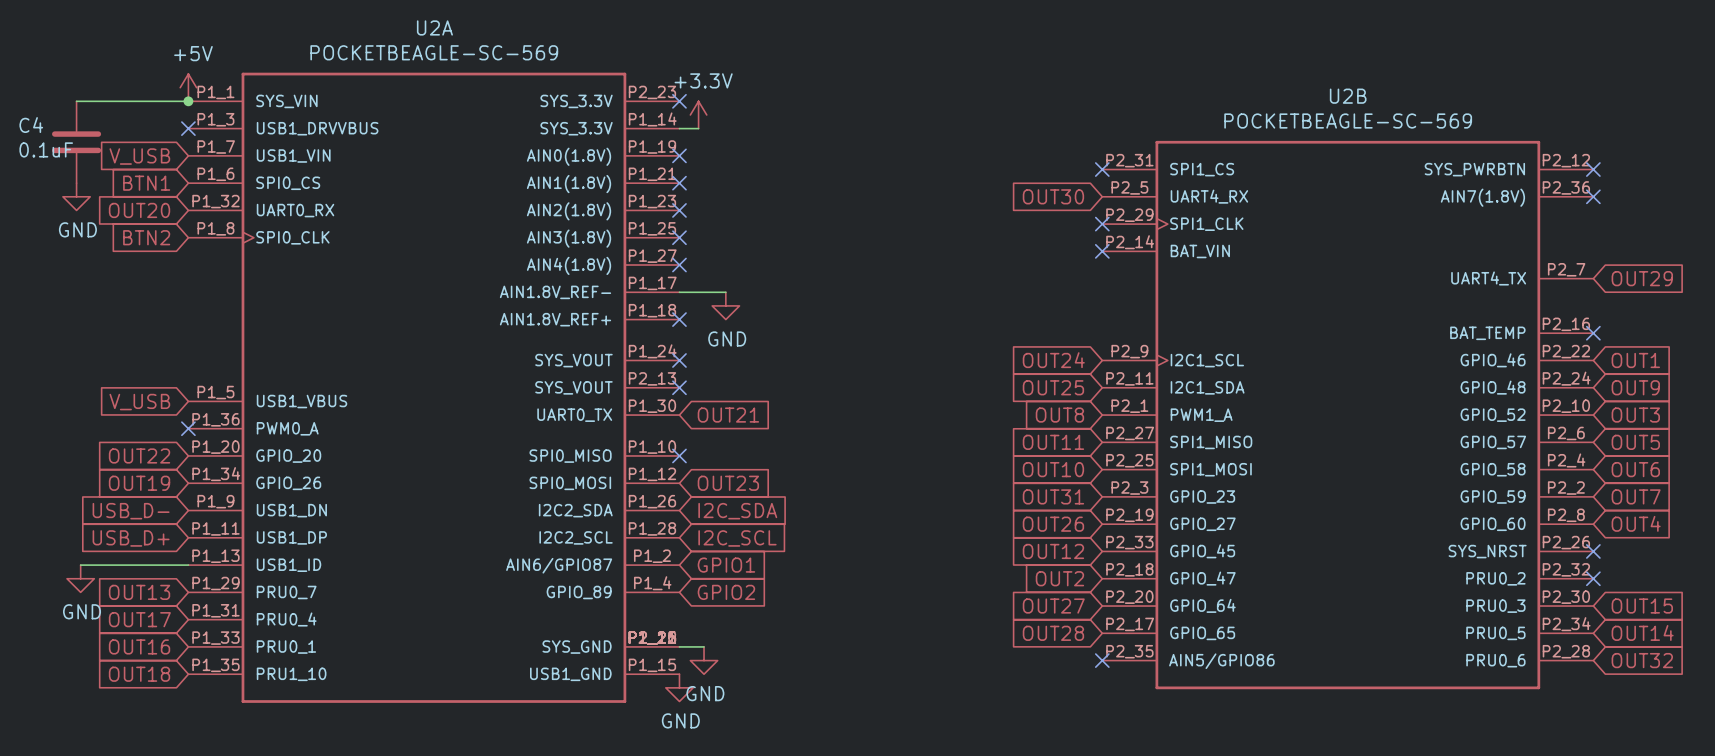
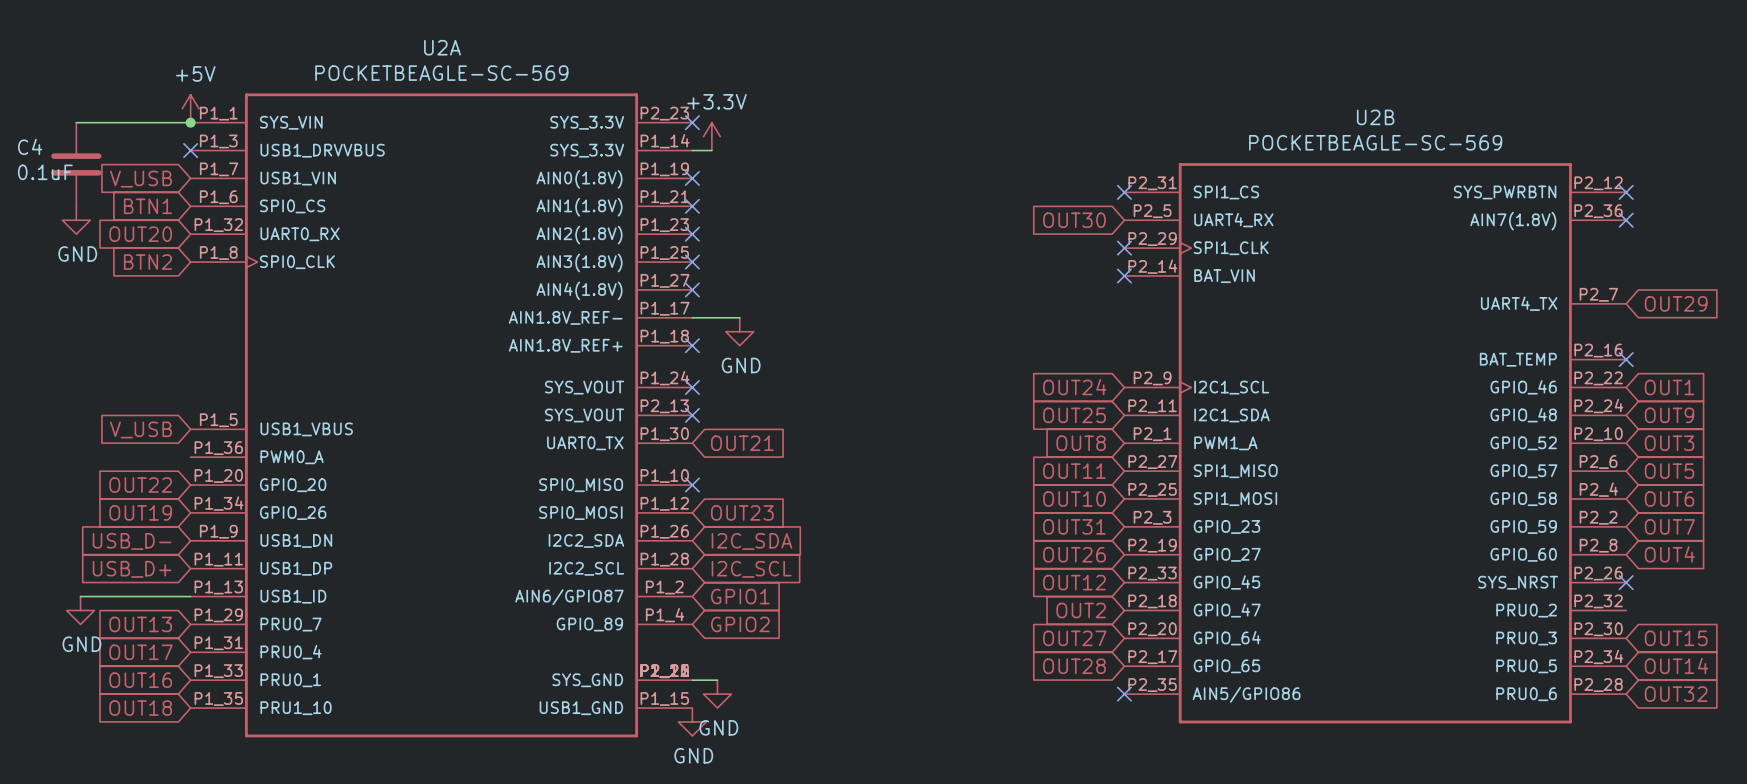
no-connect mark: (188, 428) -> none
no-connect mark: (1593, 578) -> none

